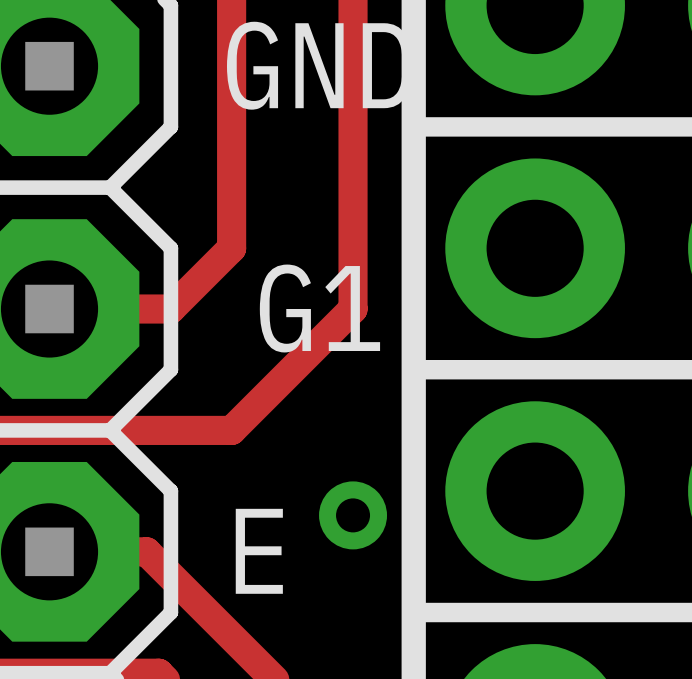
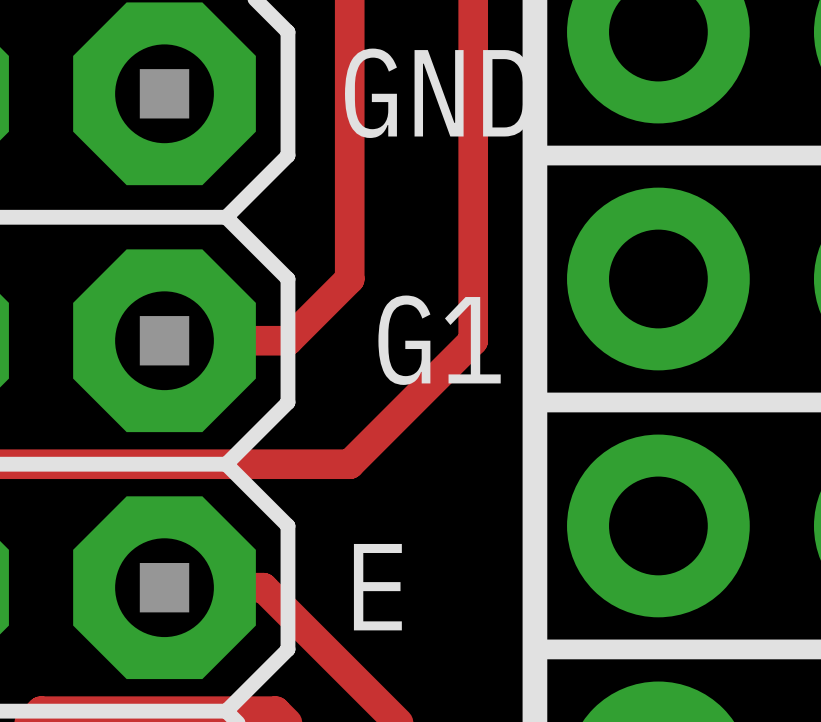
via: (353, 515) -> none

